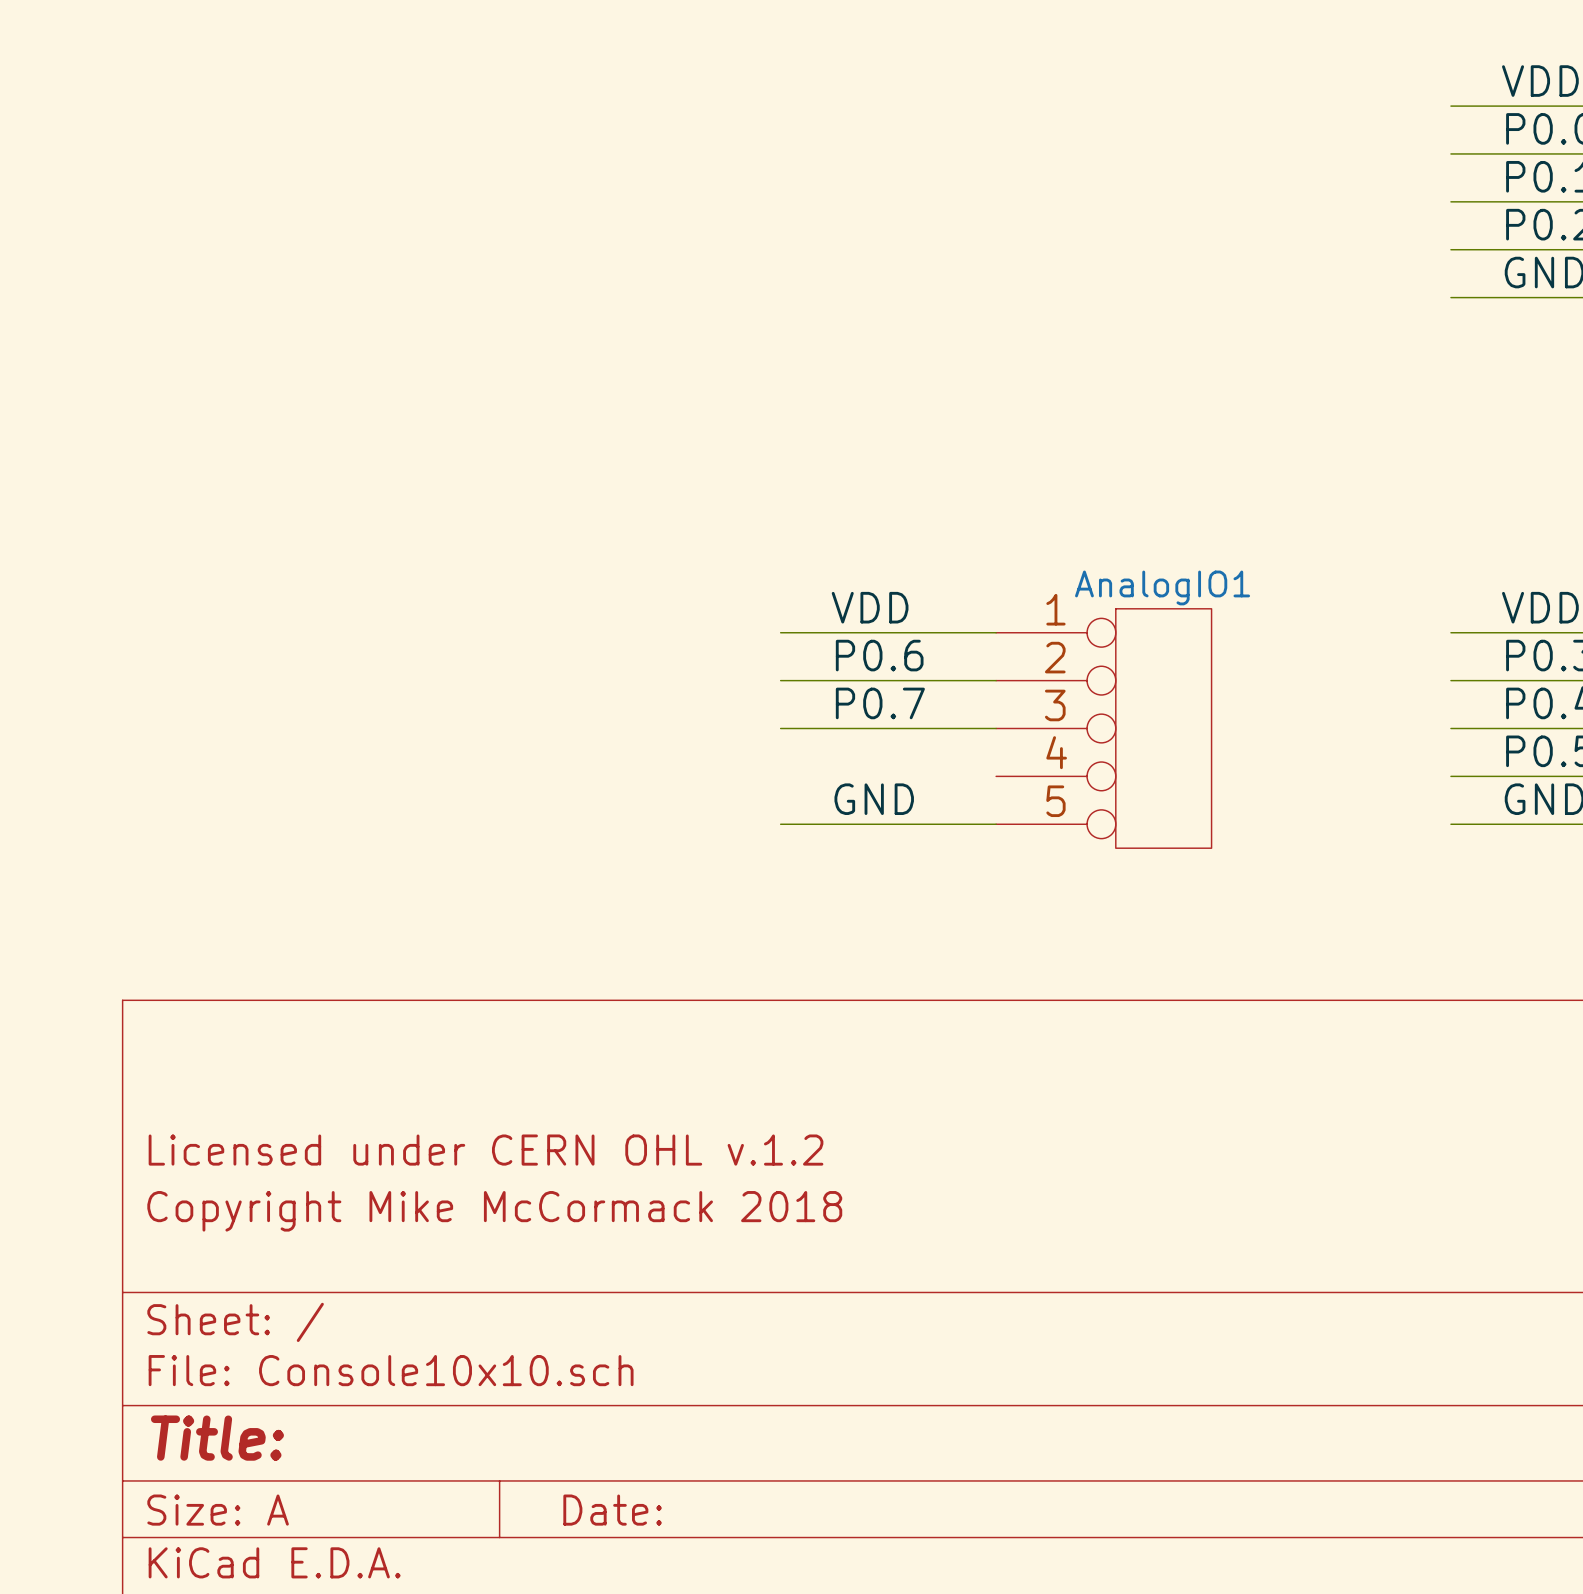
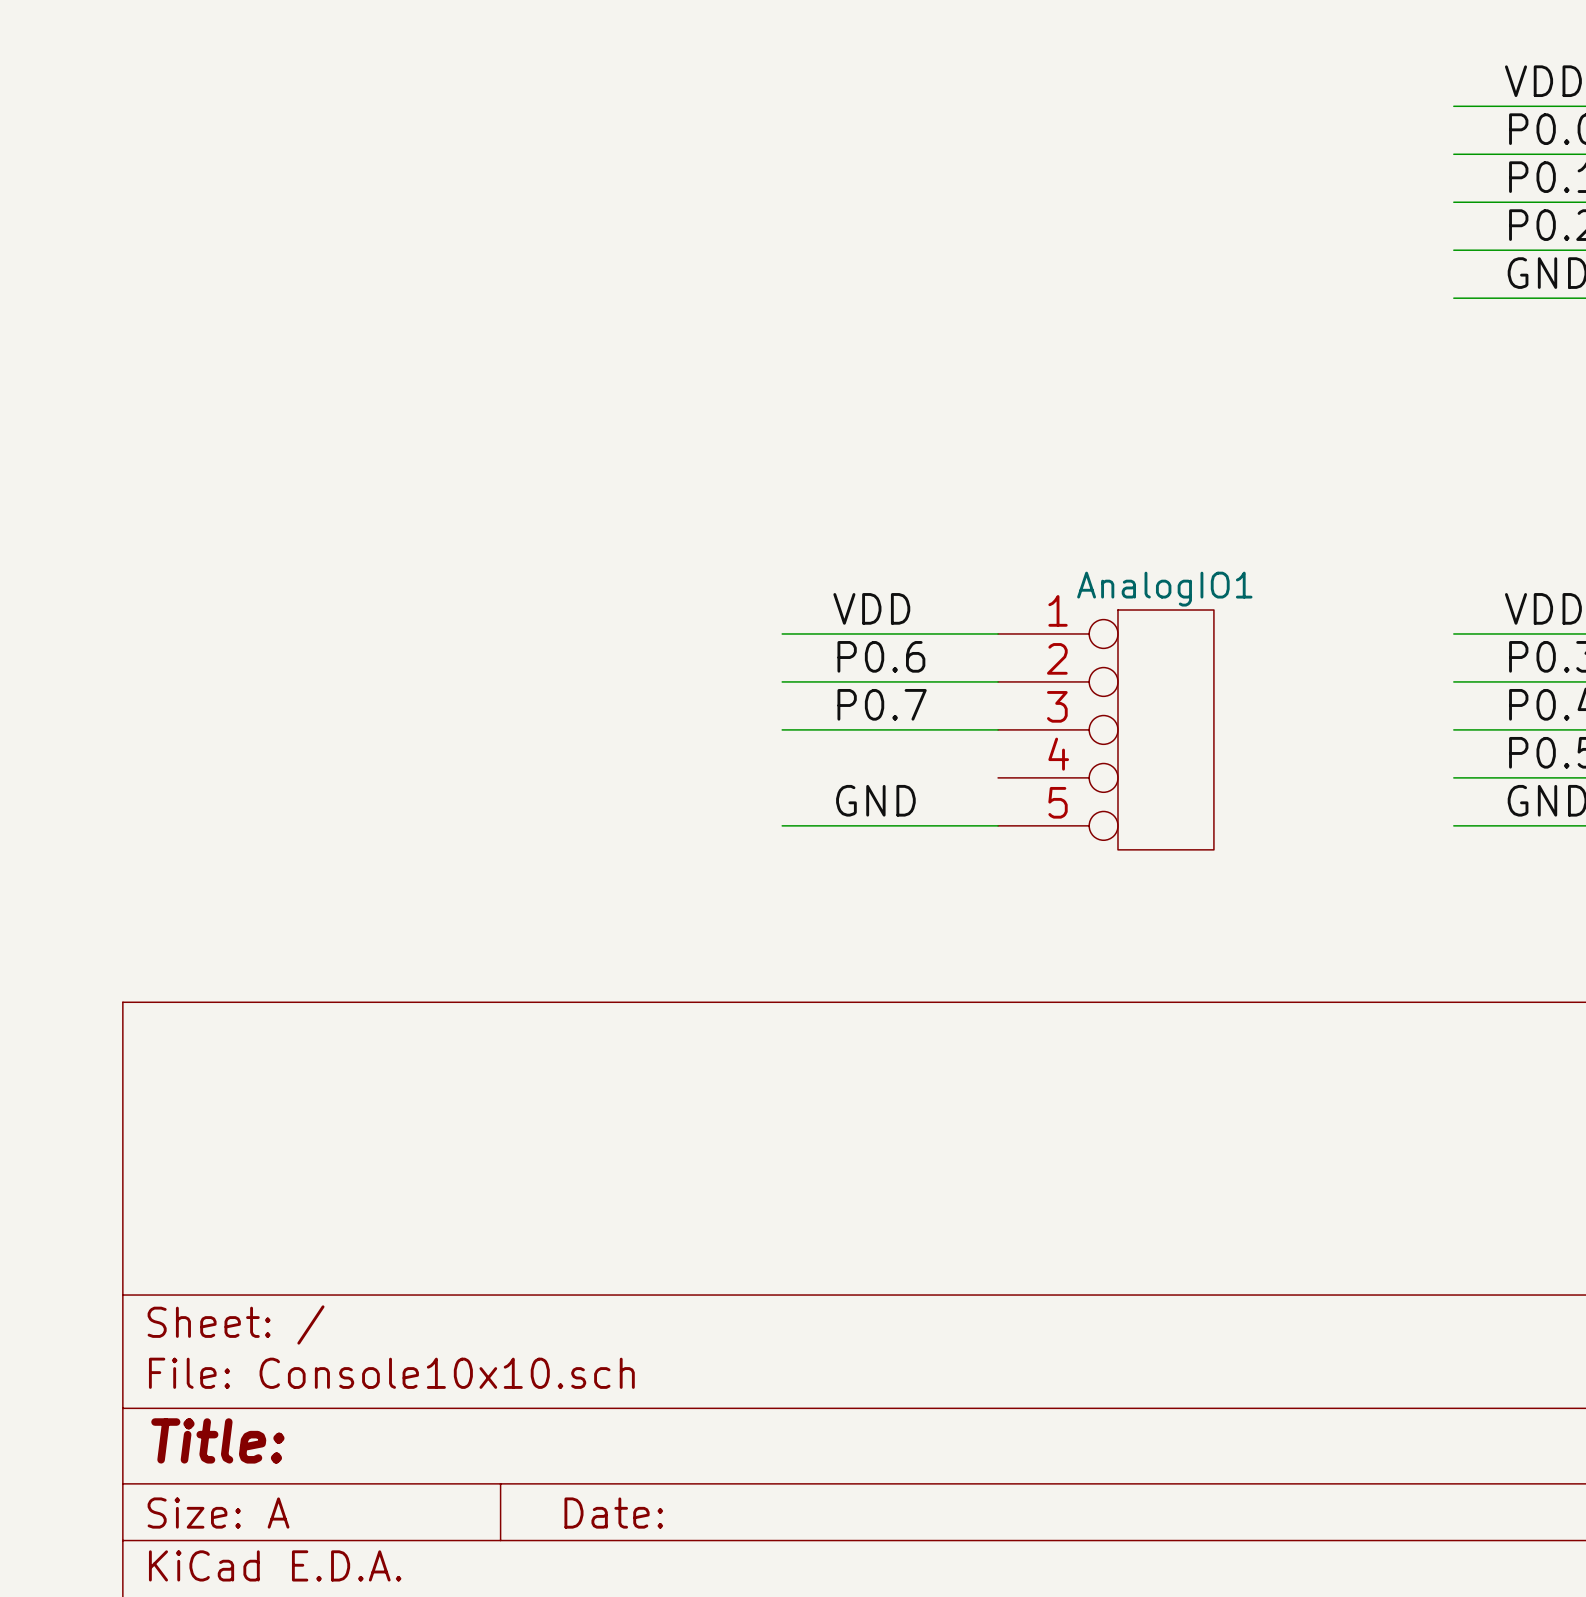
title block: Licensed under CERN OHL v.1.2 (486, 1150) -> none
title block: Copyright Mike McCormack 2018 (494, 1211) -> none

